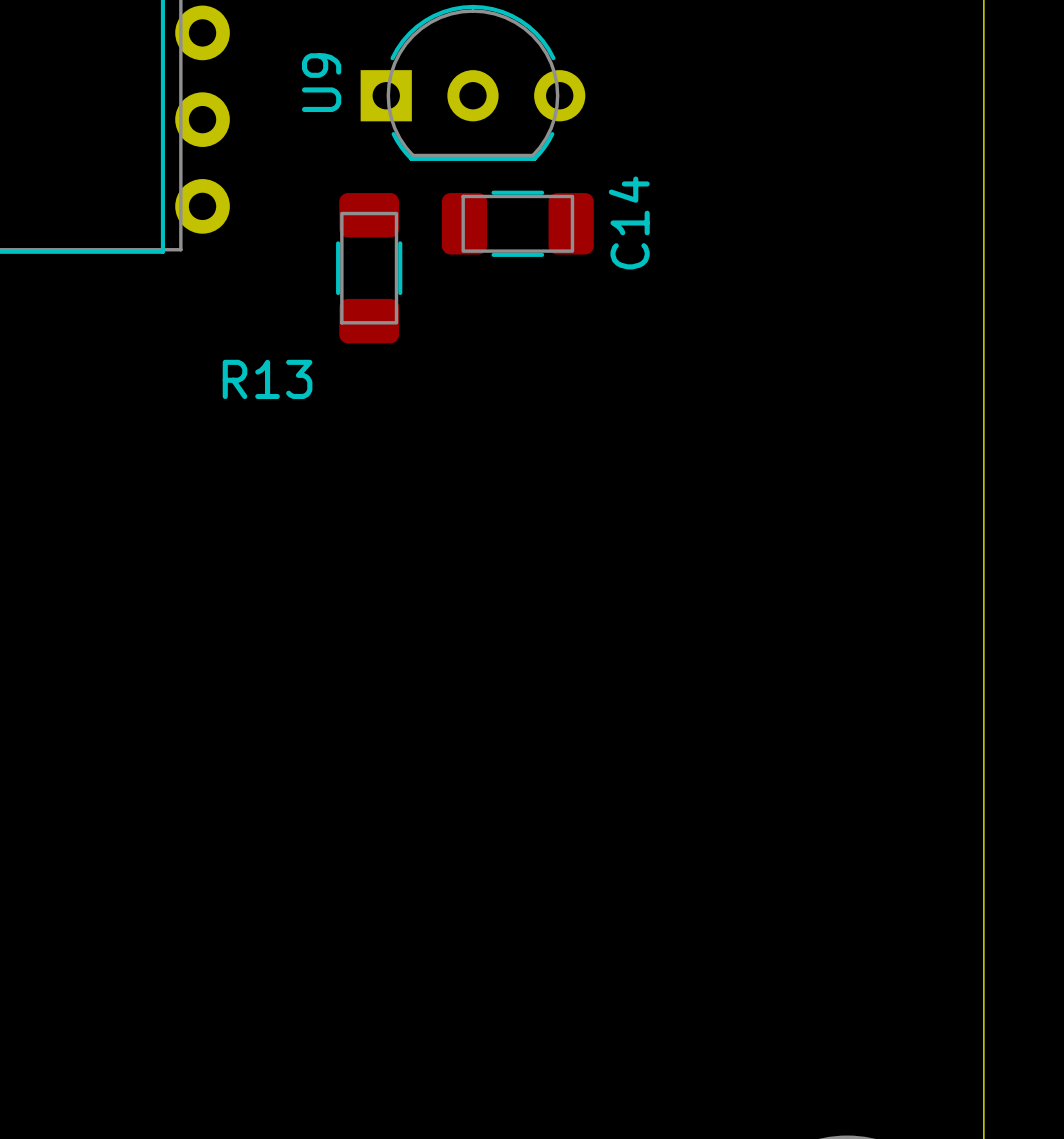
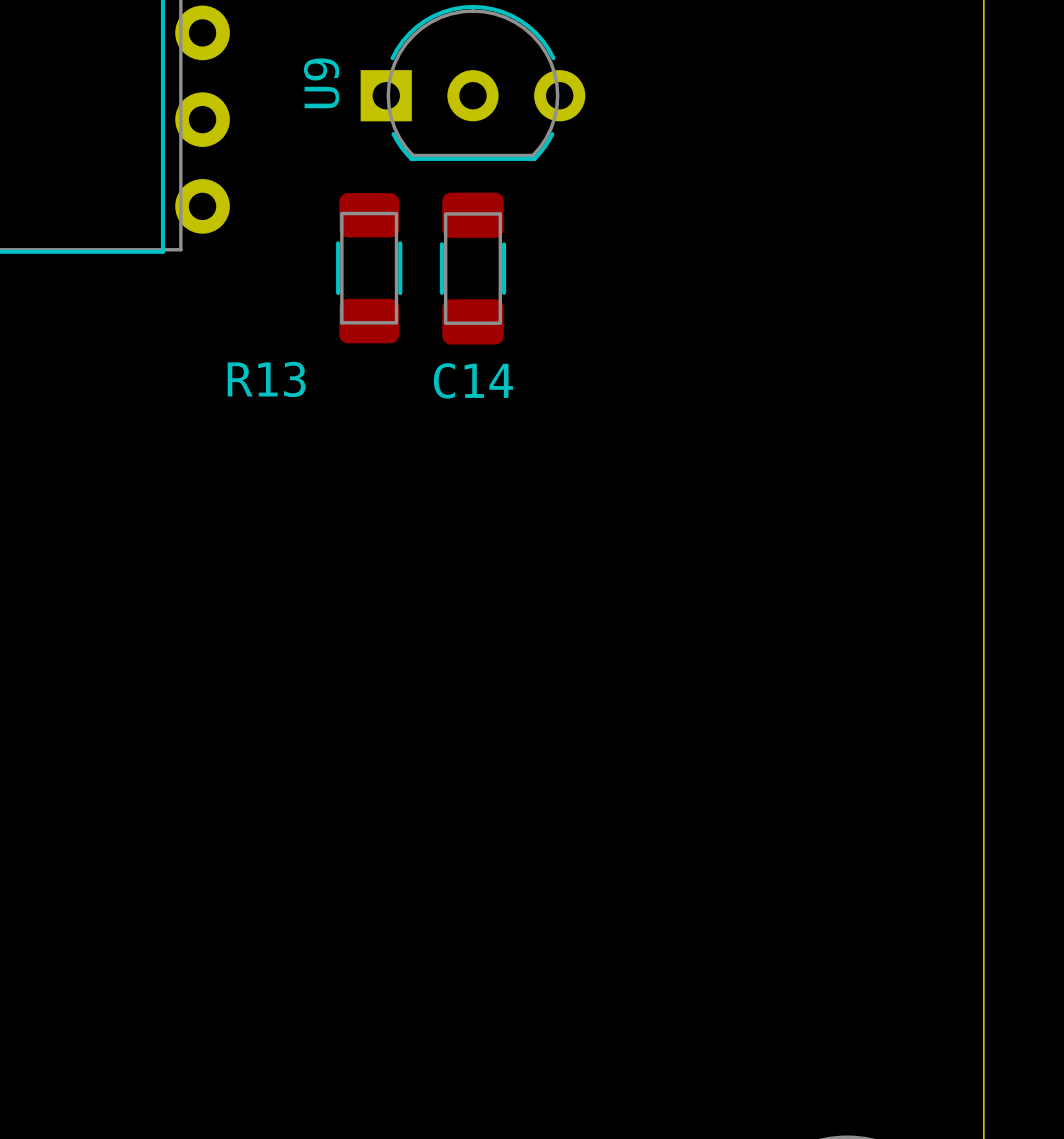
C14 rotation: 0° (517, 223) -> 90° clockwise (472, 268)

